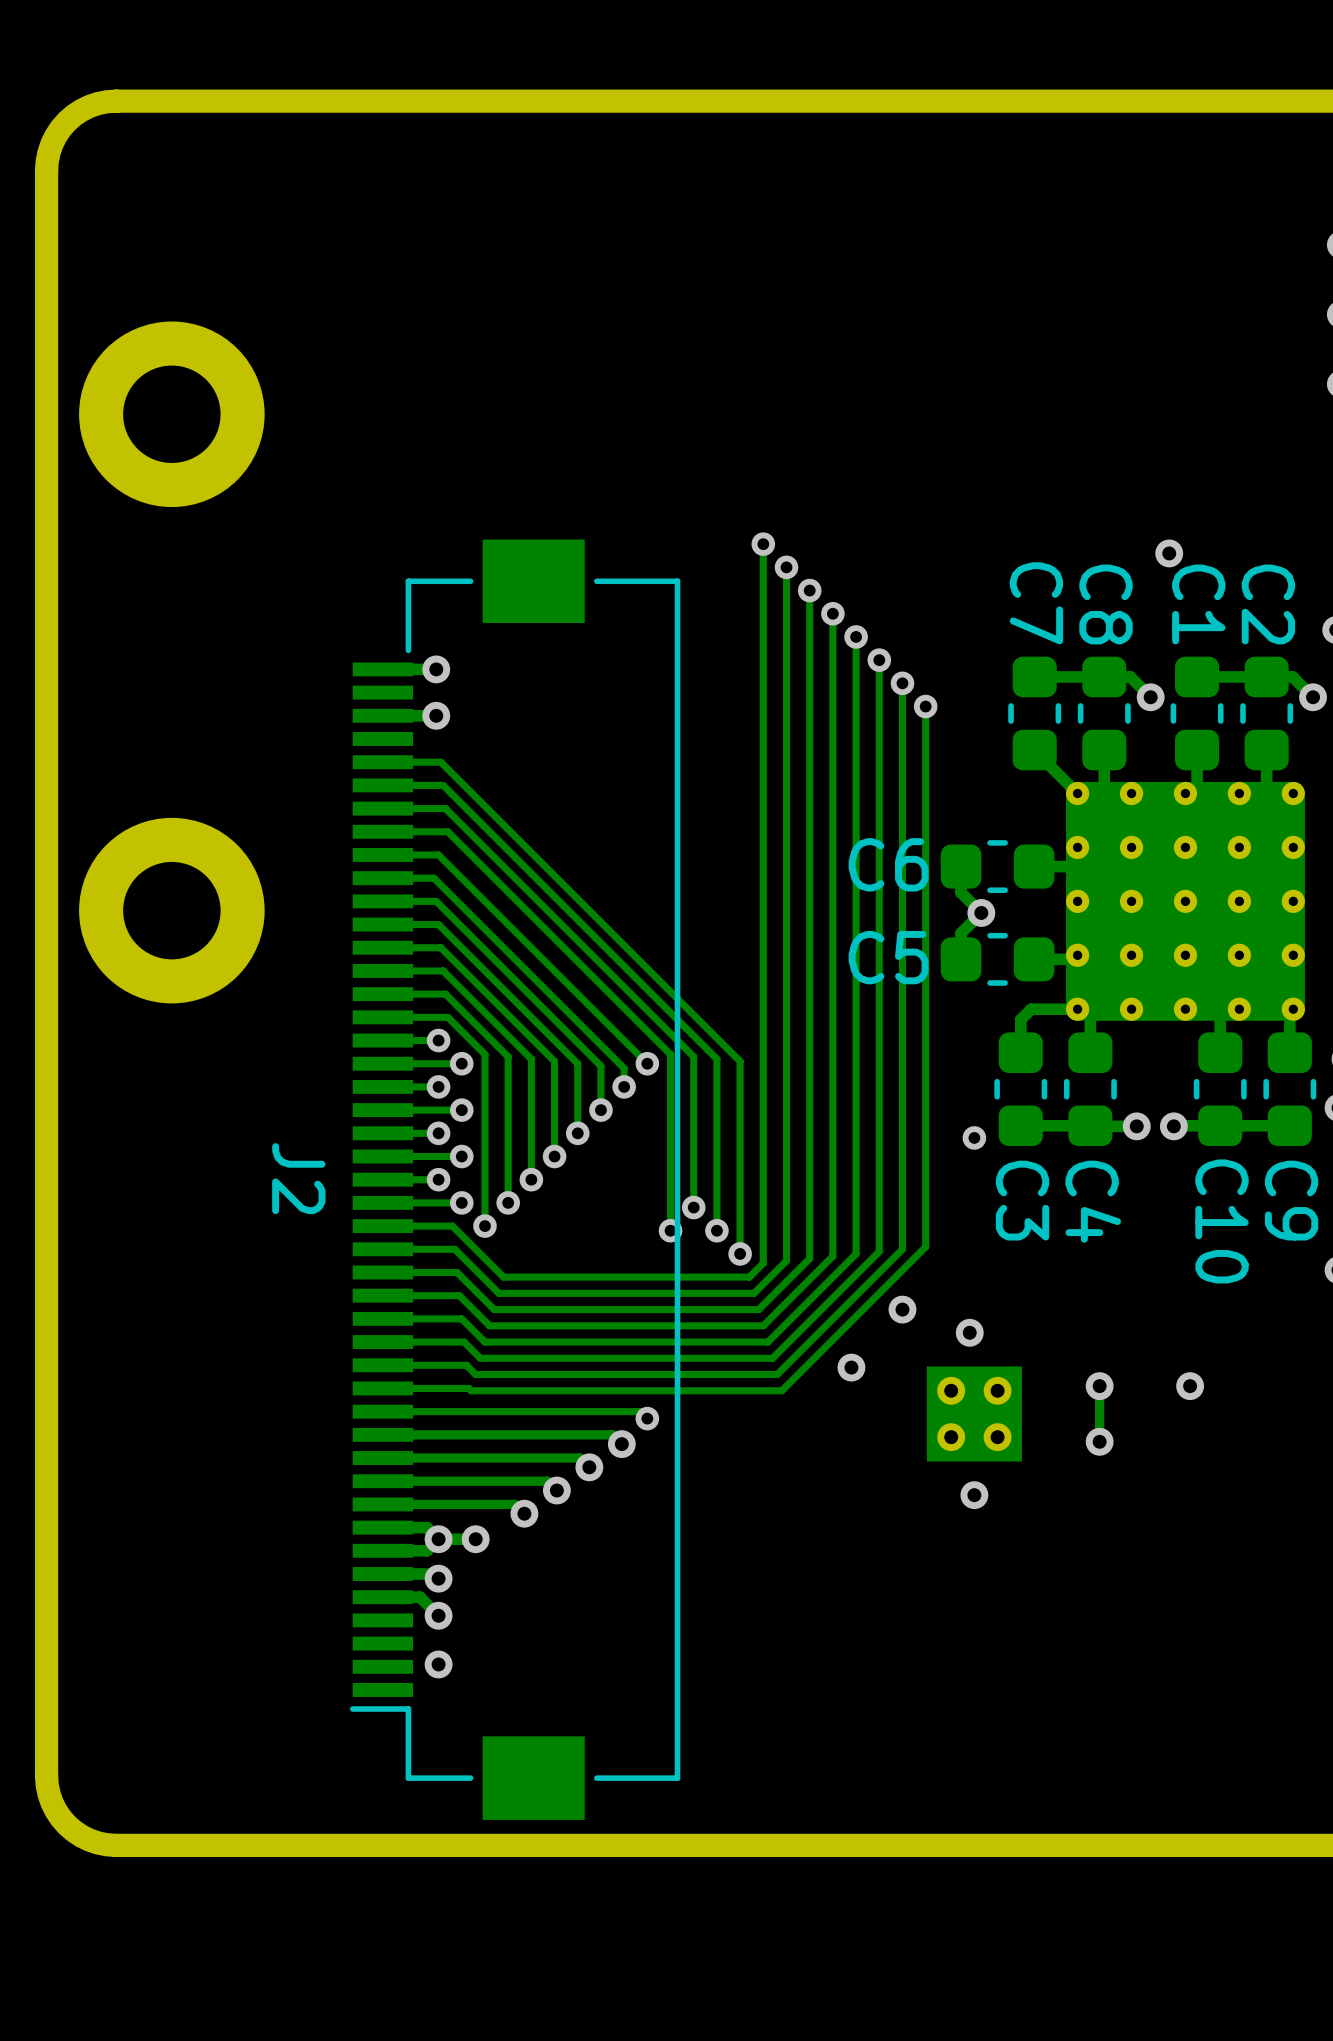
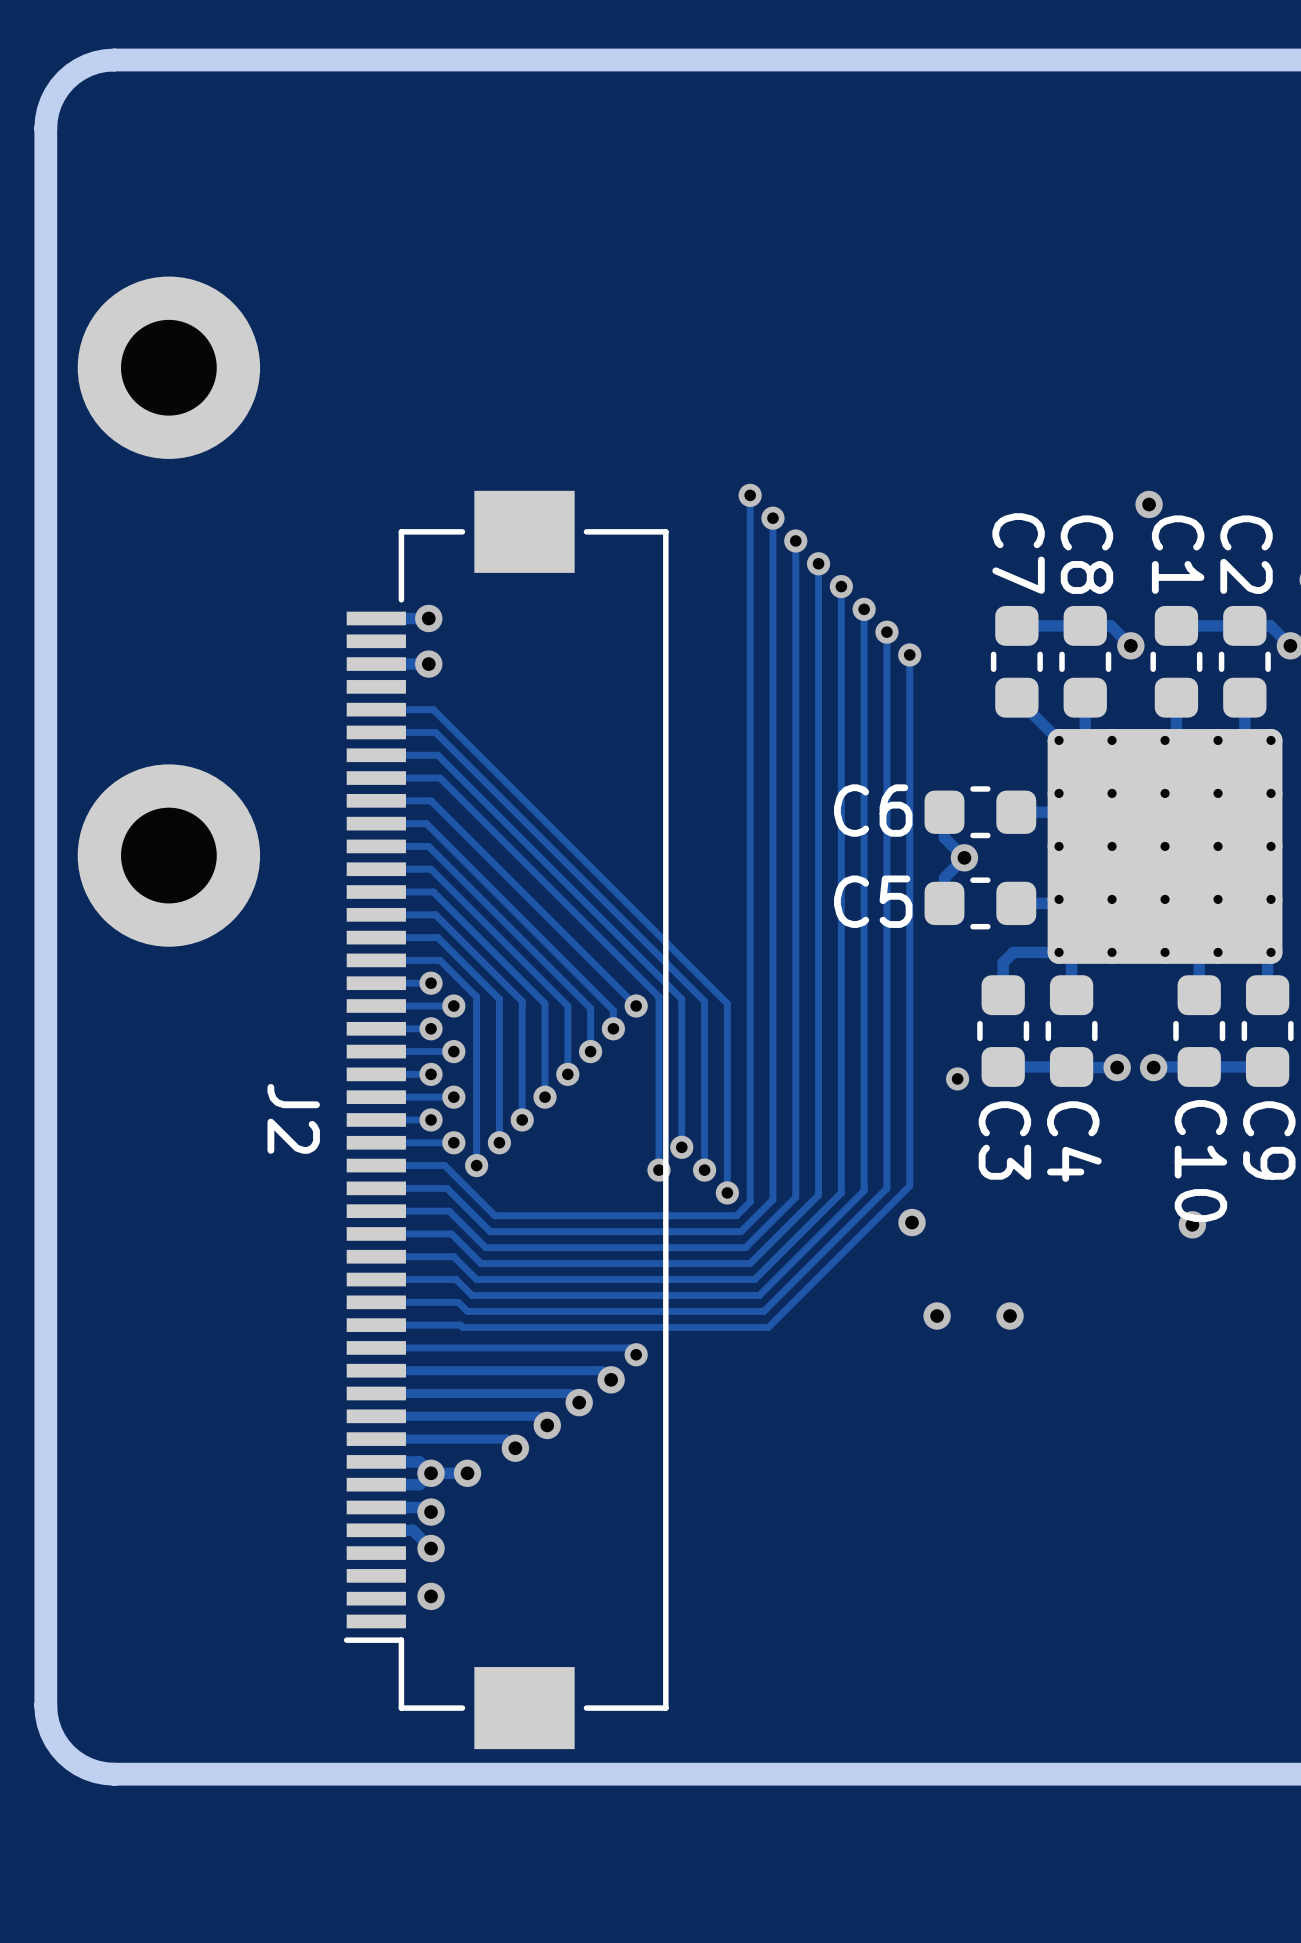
via: none -> (1192, 1224)
via position: (902, 1309) -> (912, 1222)
via: (969, 1332) -> none
via: (851, 1367) -> none
via: none -> (937, 1316)
via: none -> (1010, 1316)
track: (1099, 1386) (1099, 1441) -> none
via: (1099, 1386) -> none
via: (1190, 1386) -> none
part: (974, 1413) -> none
via: (1099, 1441) -> none
via: (974, 1495) -> none

